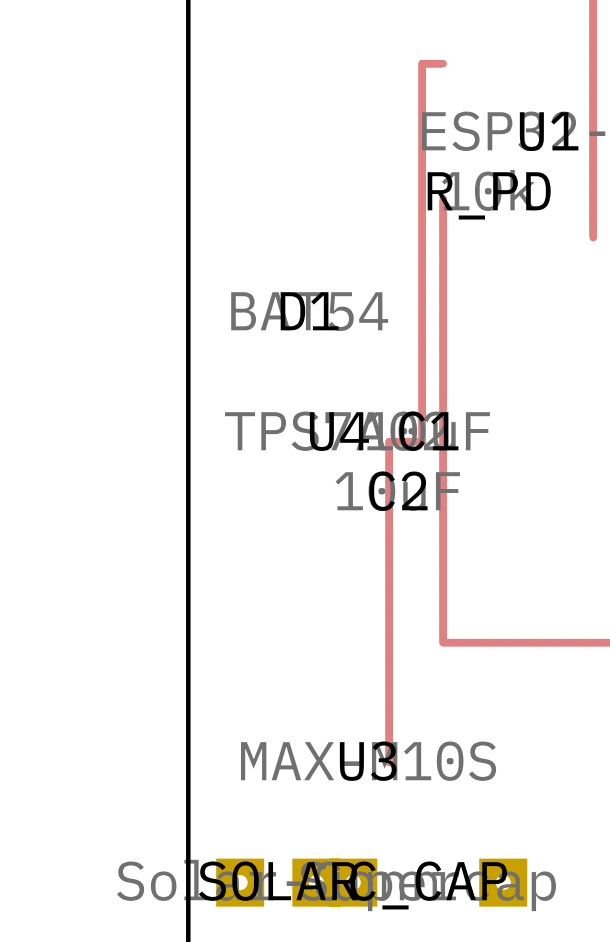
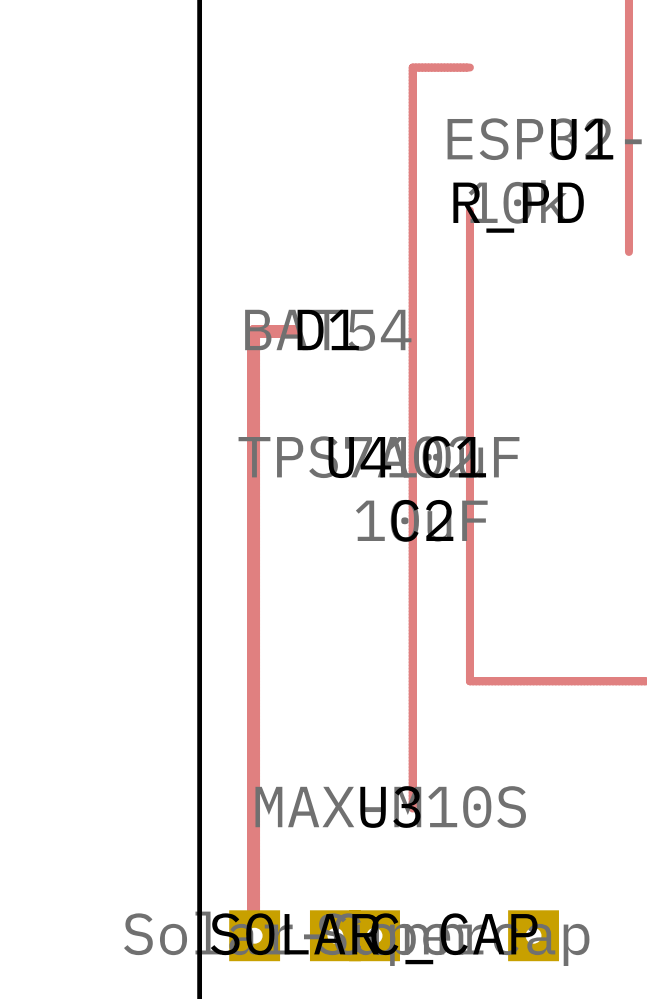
track: (422, 63) (422, 441) (389, 441) -> (447, 67) (412, 67) (412, 468)
track: none -> (295, 331) (253, 331) (253, 935)

